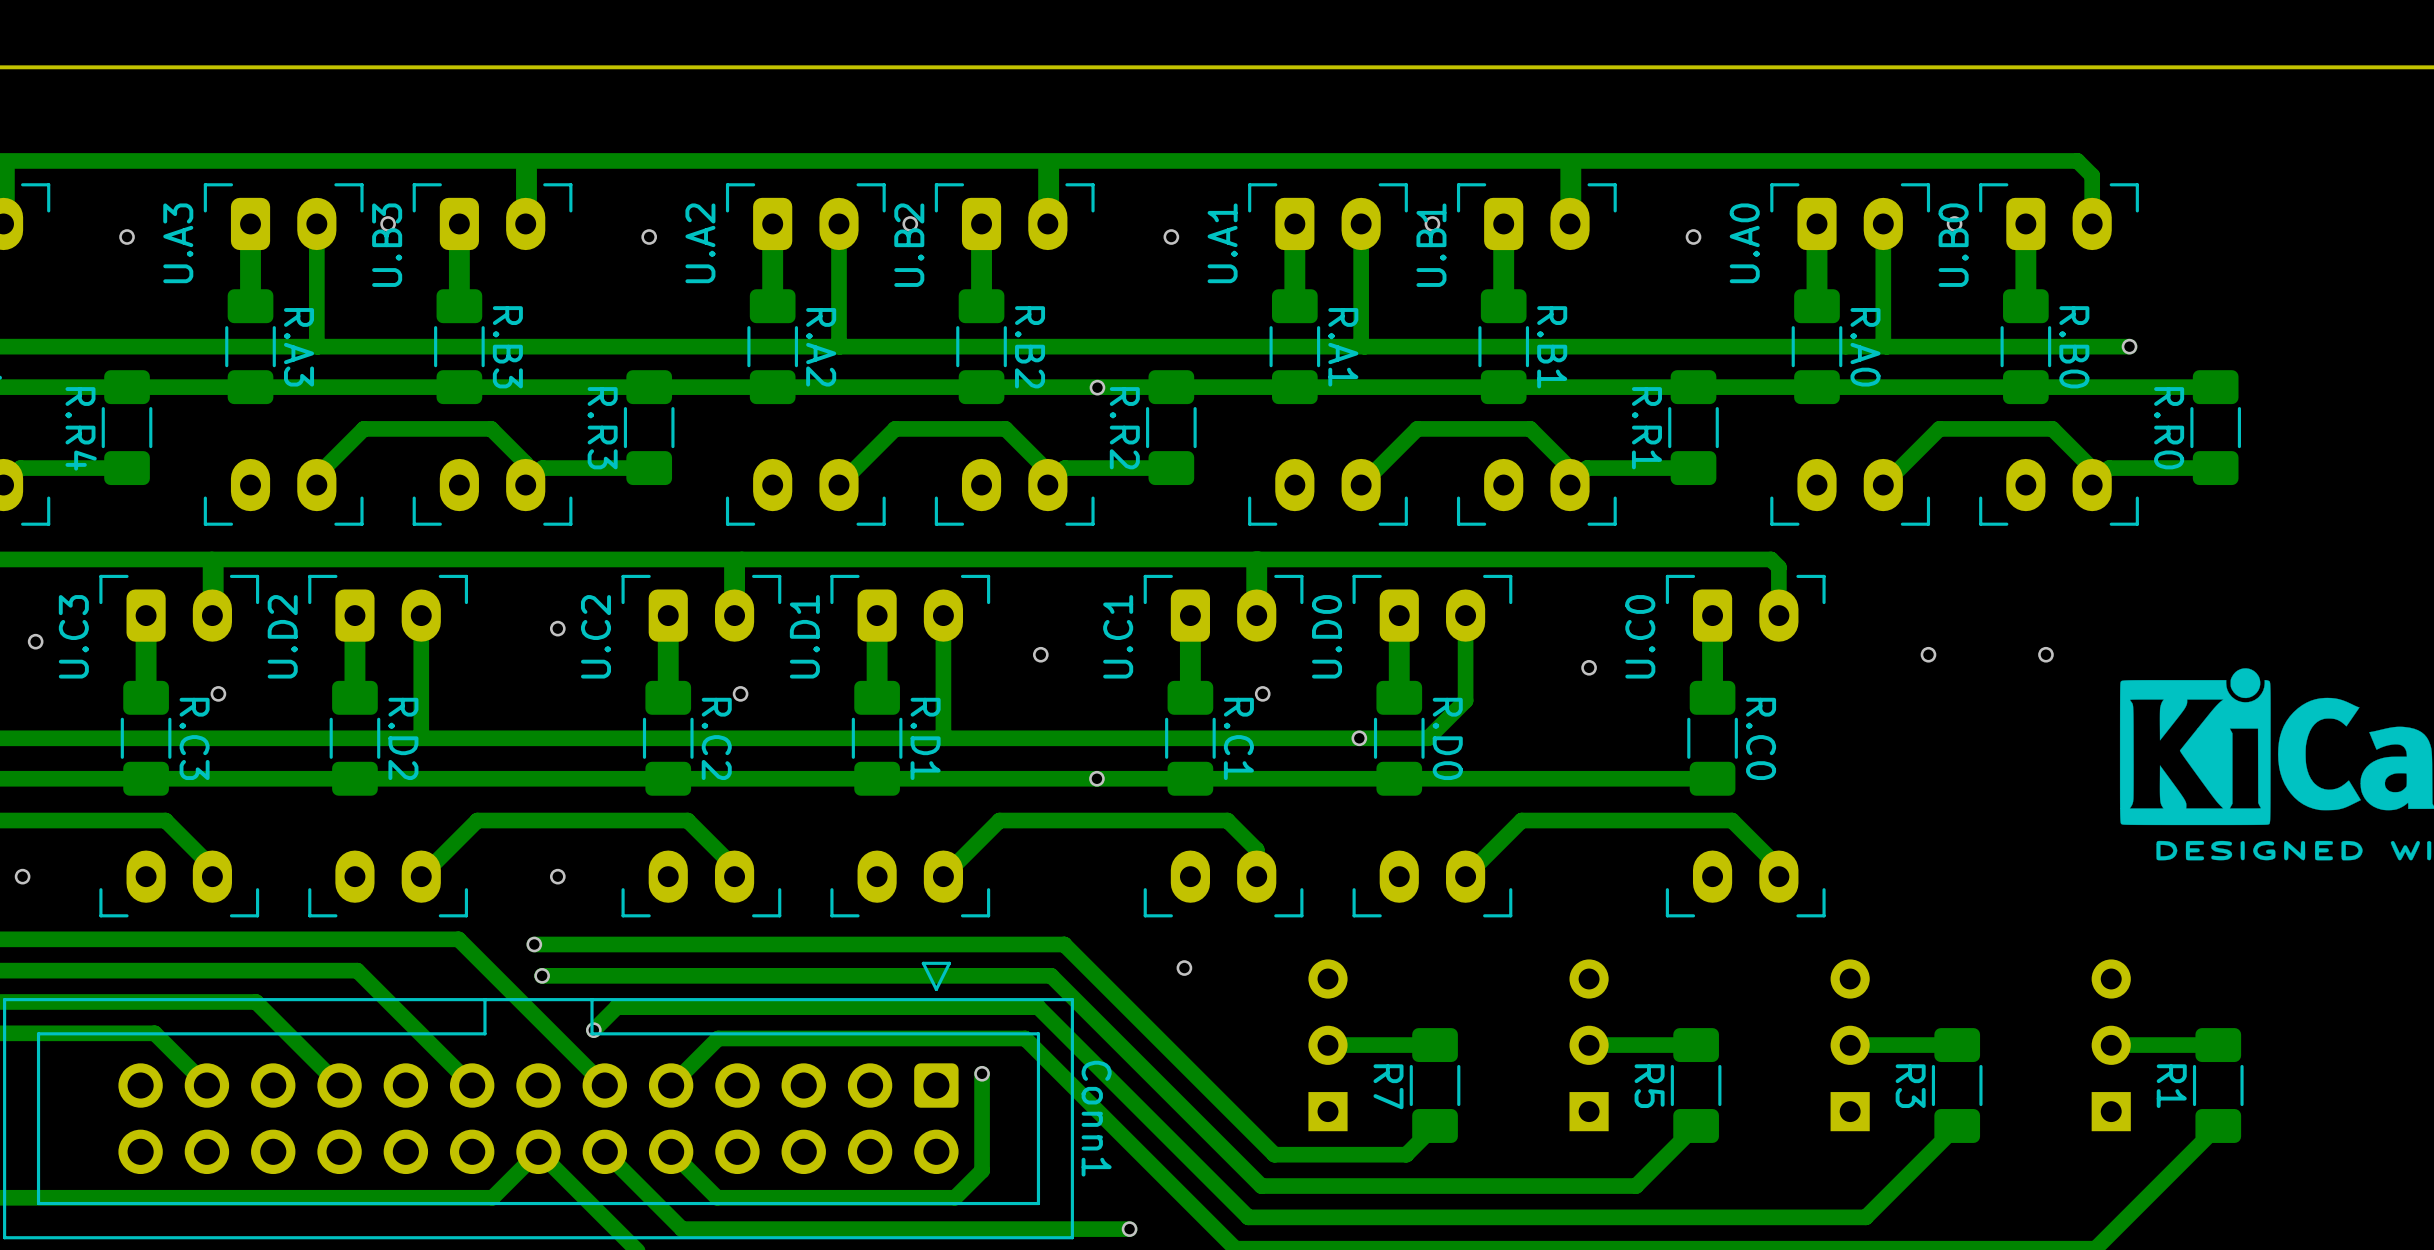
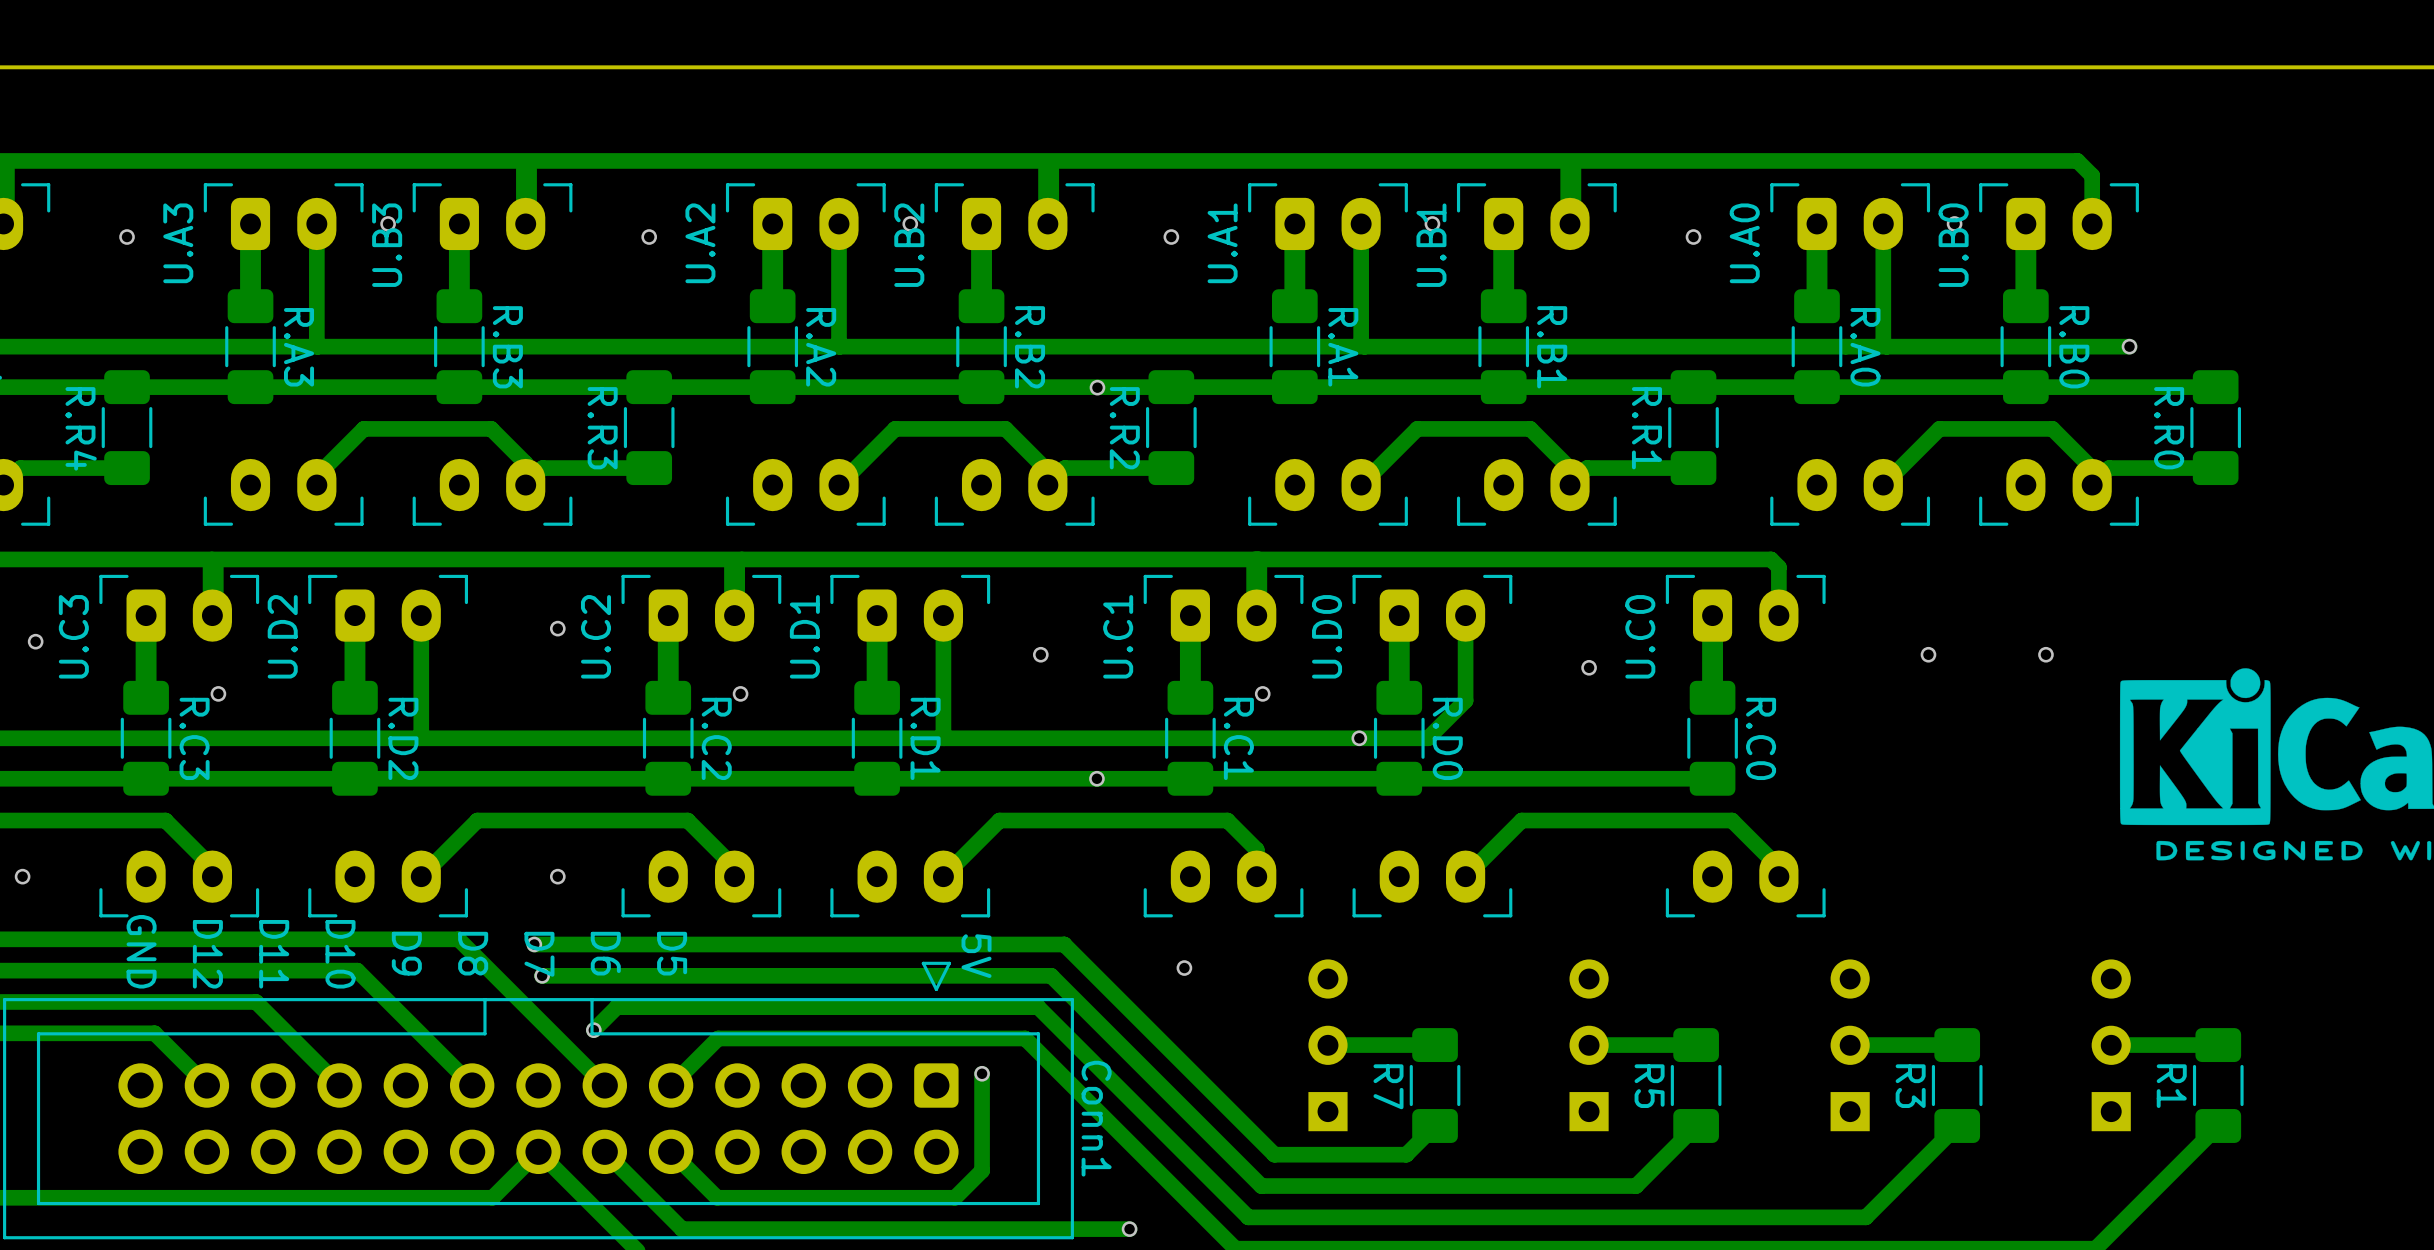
text: none -> GND (141, 951)
text: none -> D9 (406, 953)
text: none -> D8 (473, 953)
text: none -> D6 (605, 953)
text: none -> D5 (672, 953)
text: none -> D12 (207, 954)
text: none -> D11 (274, 954)
text: none -> D10 (340, 954)
text: none -> D7 (539, 954)
text: none -> 5V (976, 956)

